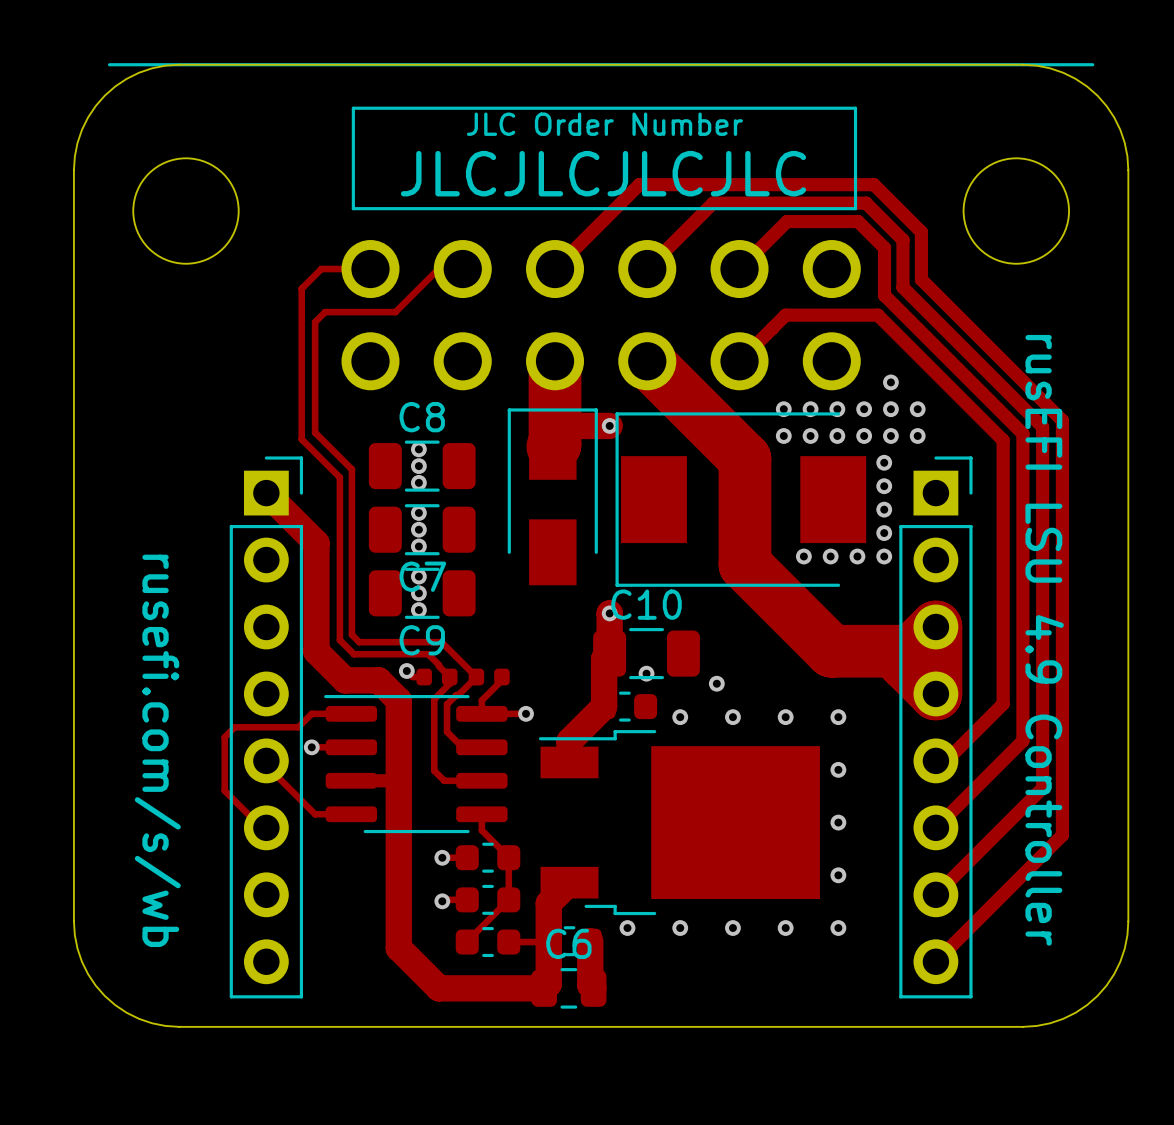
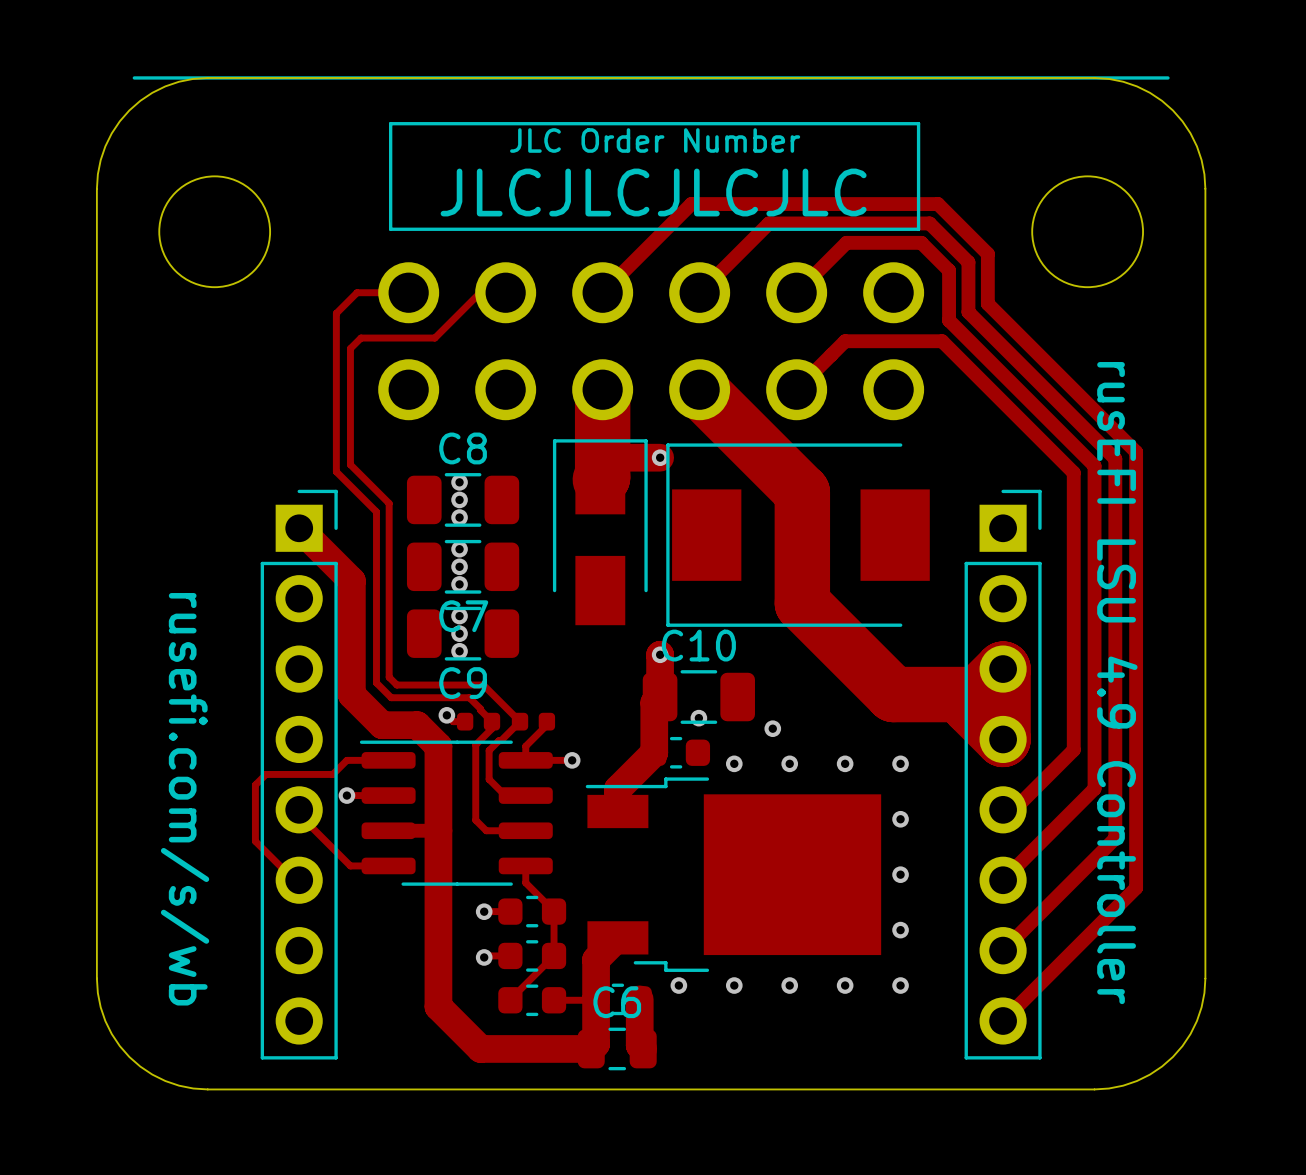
via: (890, 382) -> none
via: (783, 409) -> none
via: (810, 409) -> none
via: (837, 409) -> none
via: (864, 409) -> none
via: (890, 409) -> none
via: (917, 409) -> none
via: (783, 435) -> none
via: (810, 435) -> none
via: (837, 435) -> none
via: (864, 435) -> none
via: (890, 435) -> none
via: (917, 435) -> none
via: (884, 462) -> none
via: (884, 486) -> none
via: (884, 509) -> none
via: (884, 533) -> none
via: (803, 556) -> none
via: (830, 556) -> none
via: (857, 556) -> none
via: (884, 556) -> none

